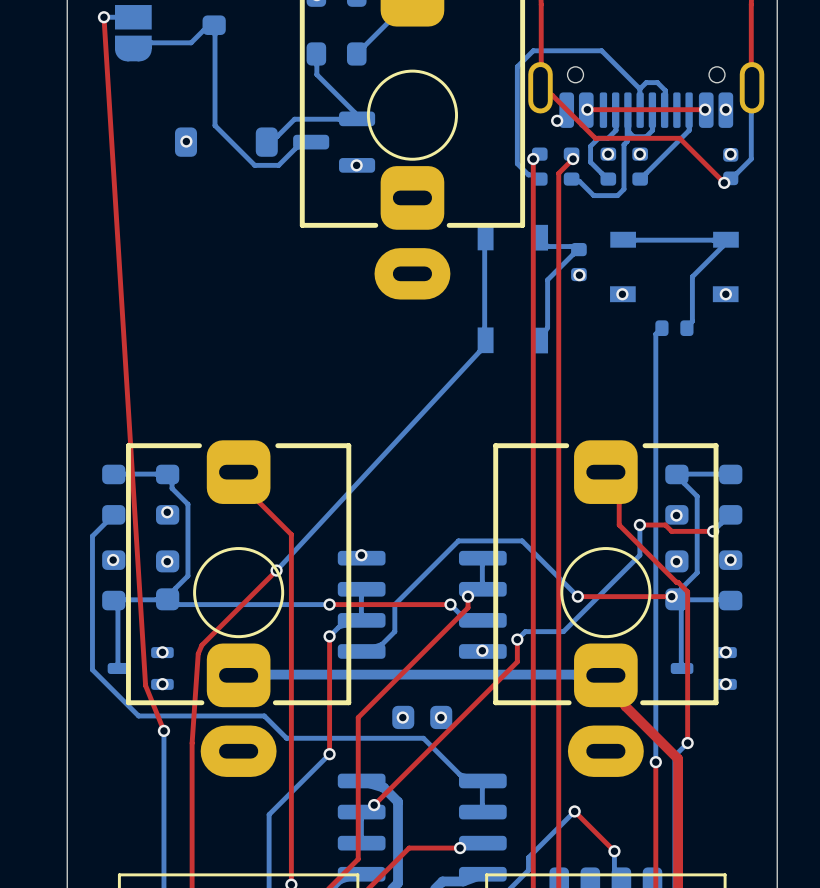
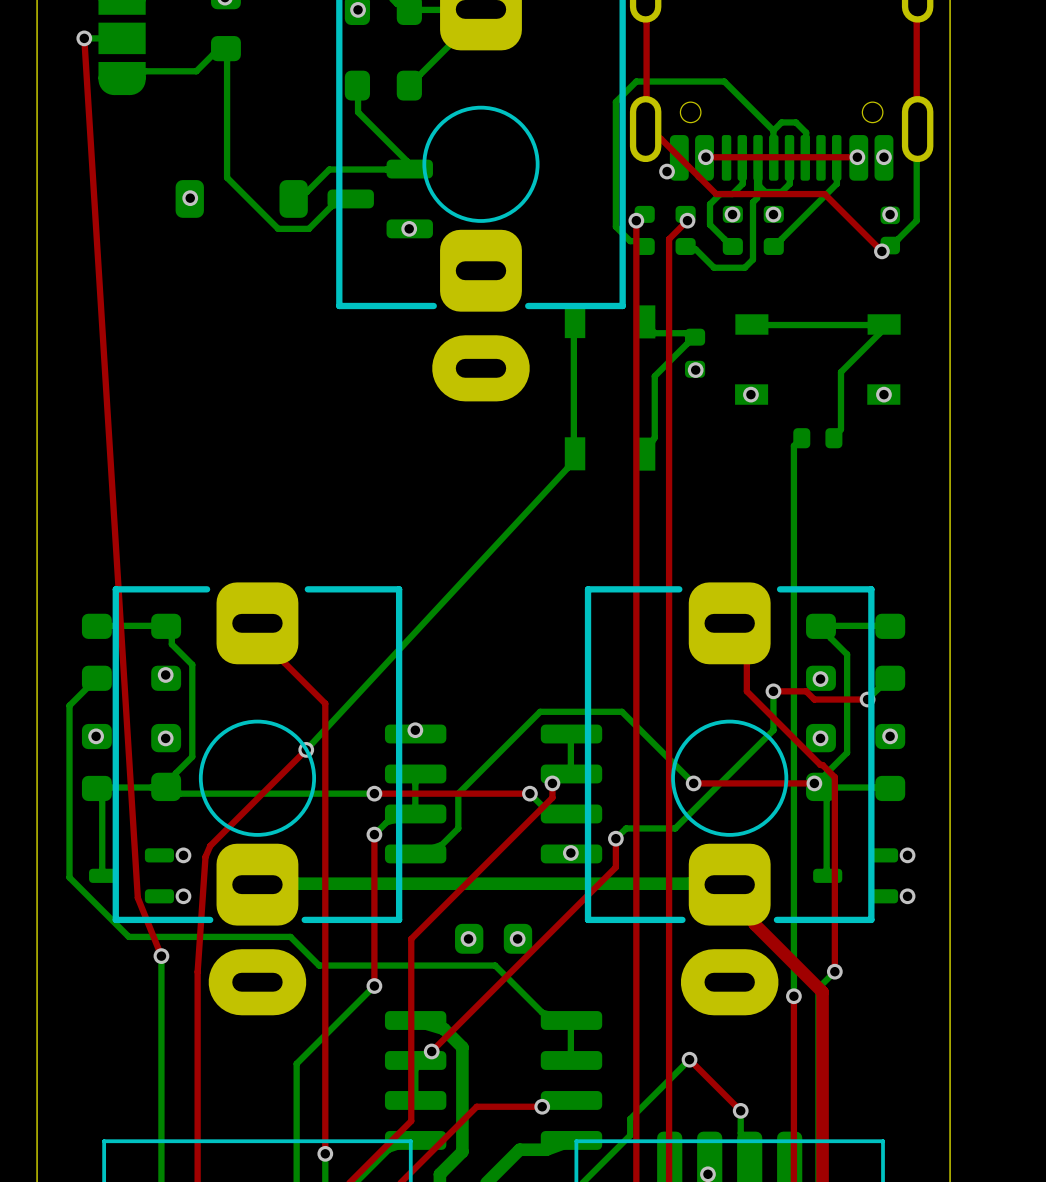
via: (162, 652) -> none
via: none -> (183, 855)
via: (725, 652) -> none
via: none -> (907, 855)
via: (162, 684) -> none
via: none -> (183, 896)
via: (725, 684) -> none
via: none -> (907, 896)

